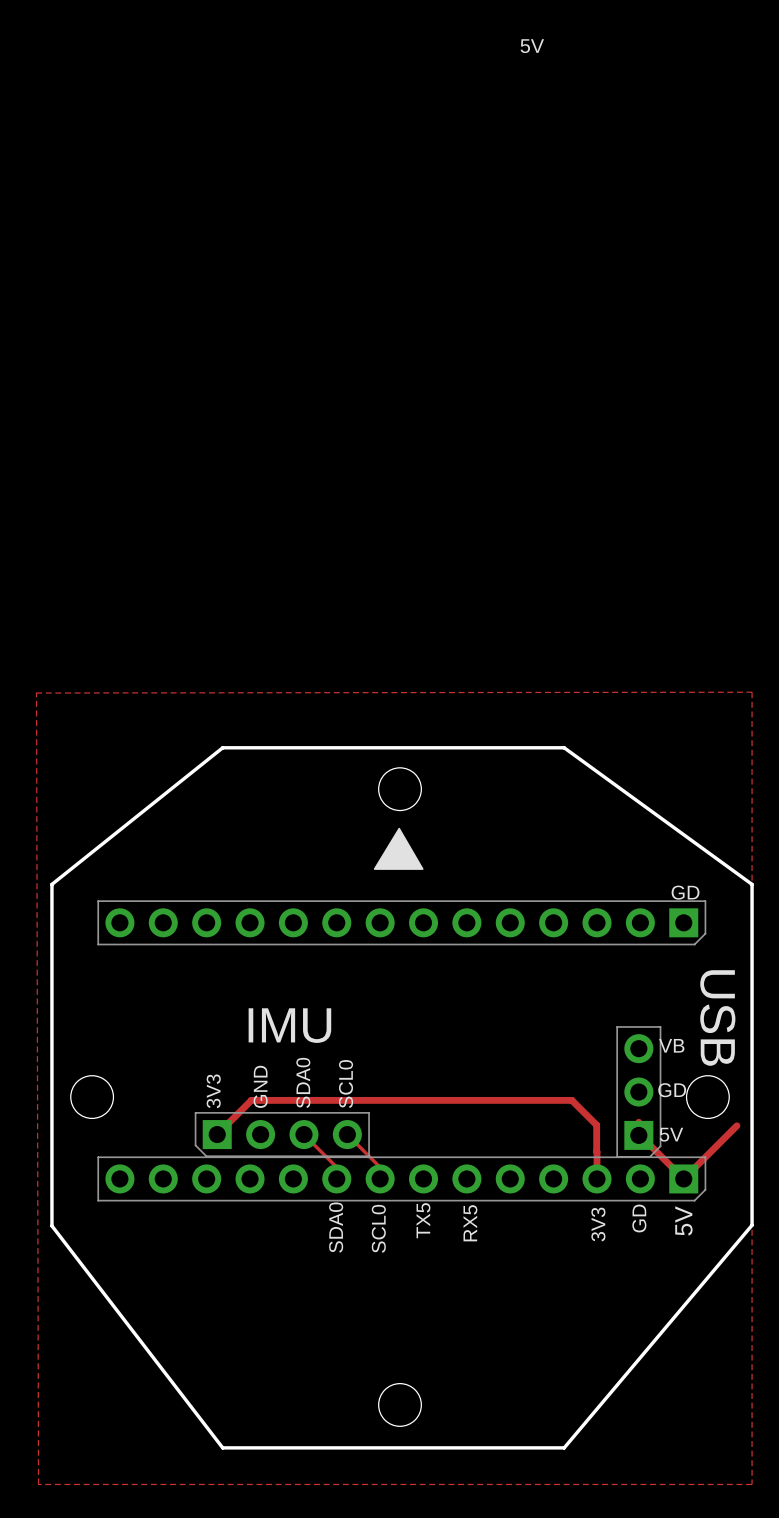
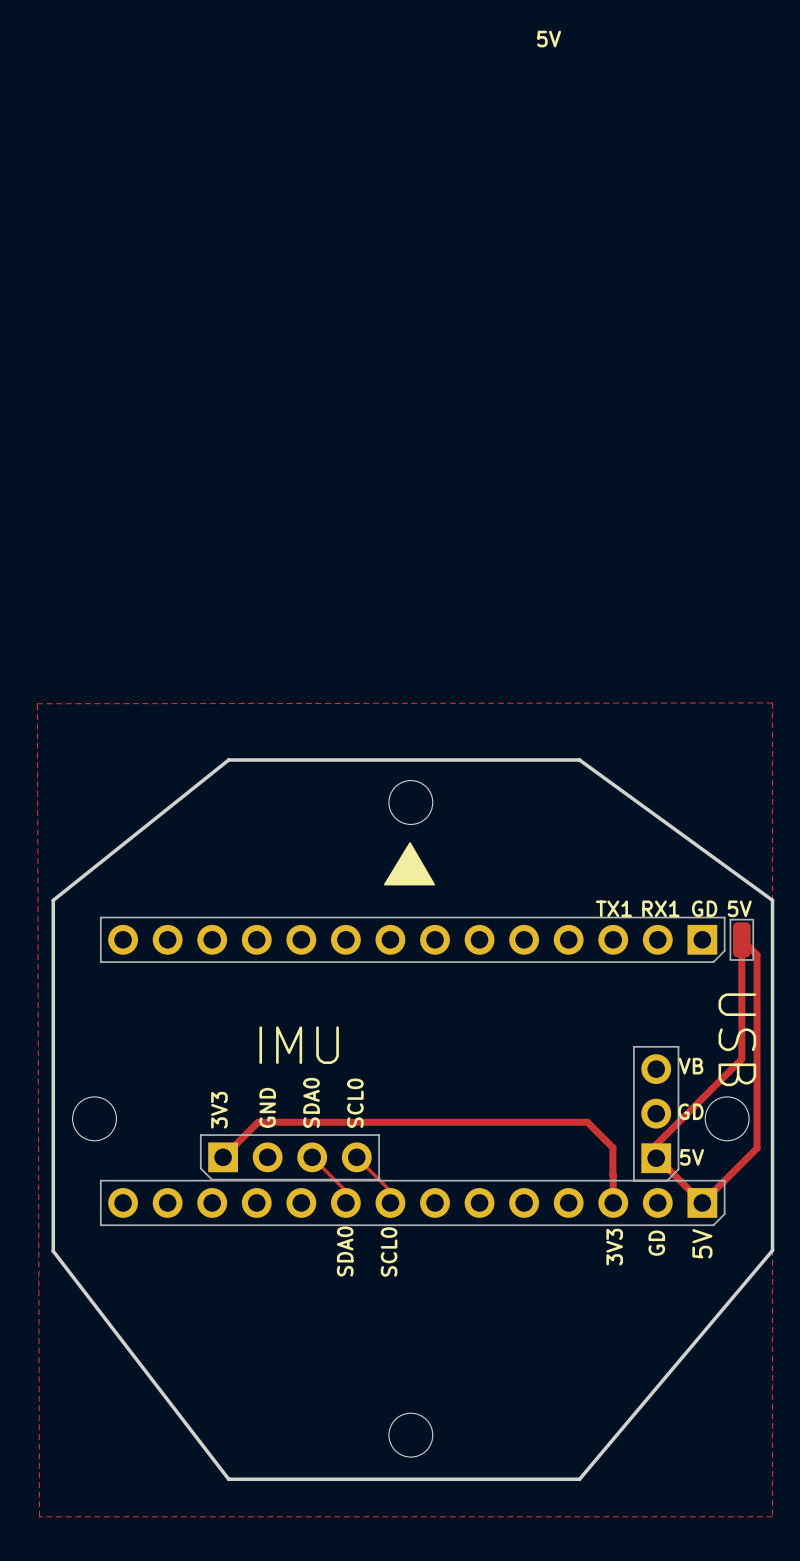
text: none -> TX1 (613, 908)
text: none -> RX1 (660, 908)
text: none -> 5V (739, 908)
part: none -> (741, 939)
track: none -> (656, 1144) (741, 1059) (741, 939) (757, 954) (757, 1148)
text: TX5 (423, 1220) -> none
text: RX5 (470, 1223) -> none

